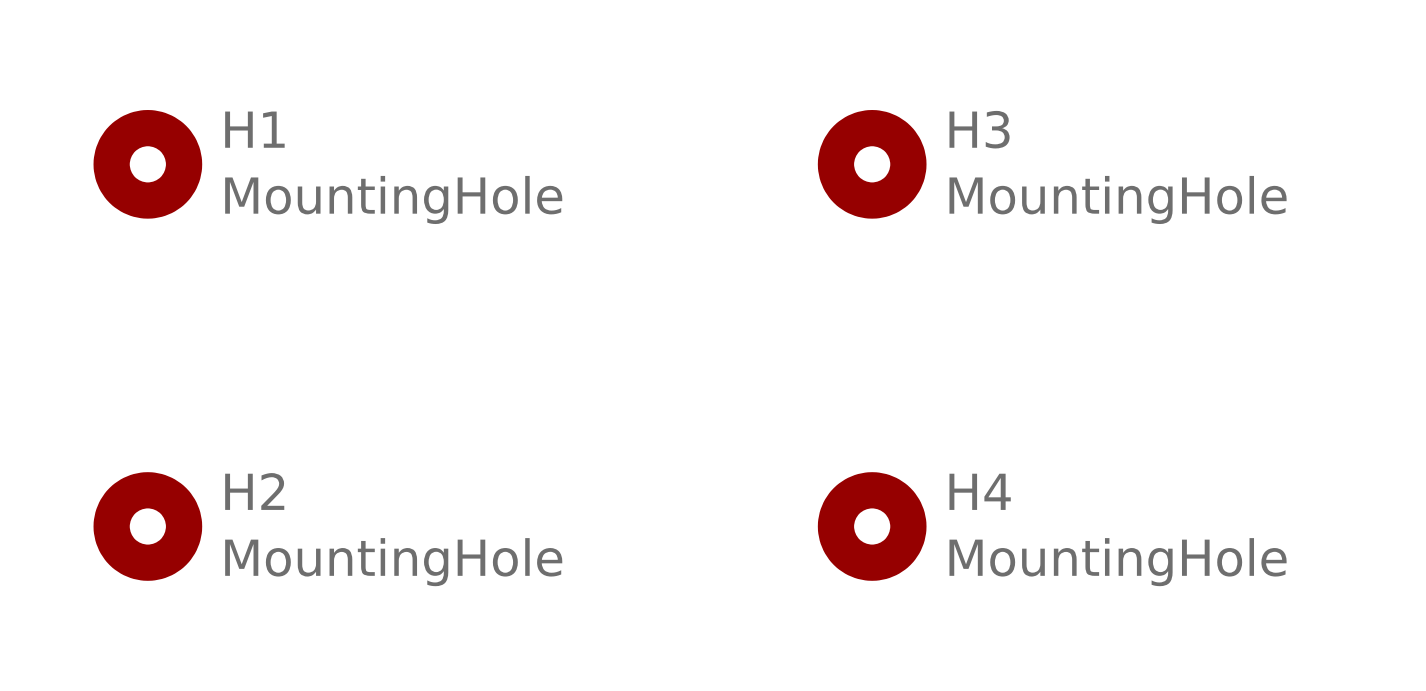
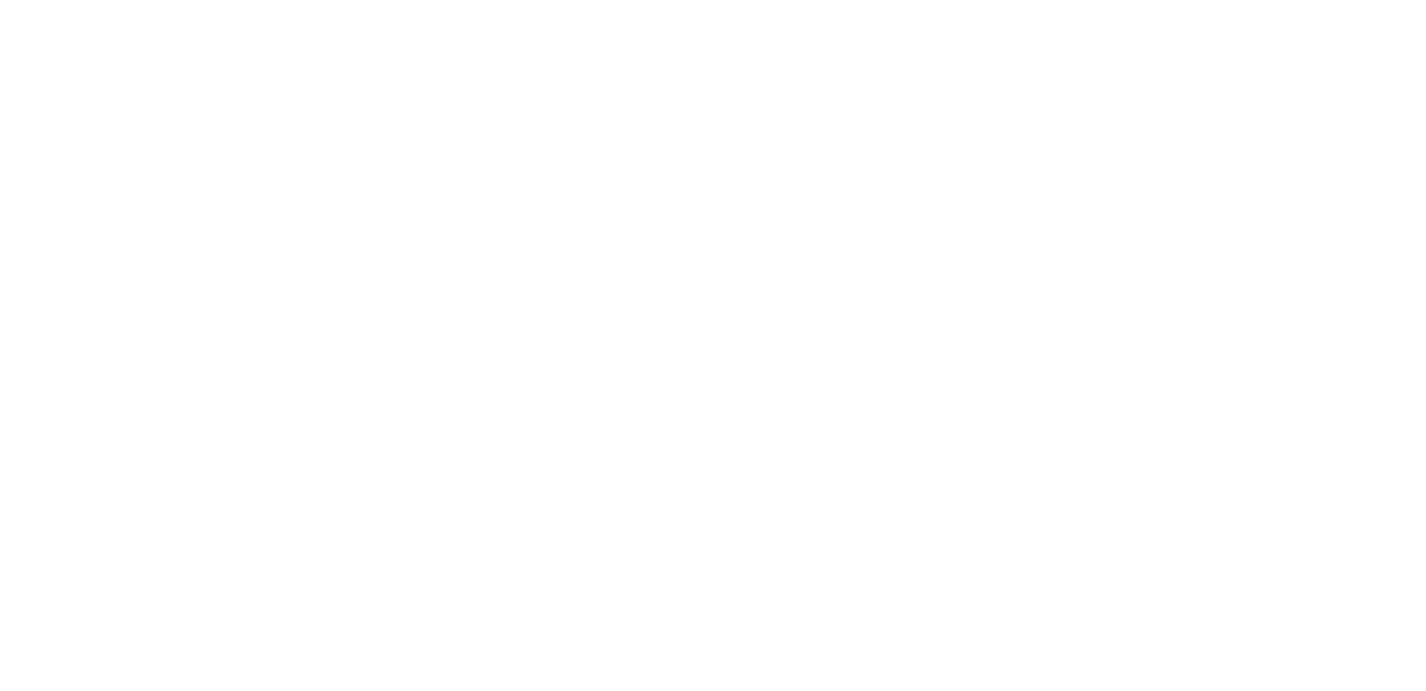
H1: MountingHole (147, 164) -> none
H3: MountingHole (872, 164) -> none
H2: MountingHole (147, 526) -> none
H4: MountingHole (872, 526) -> none

